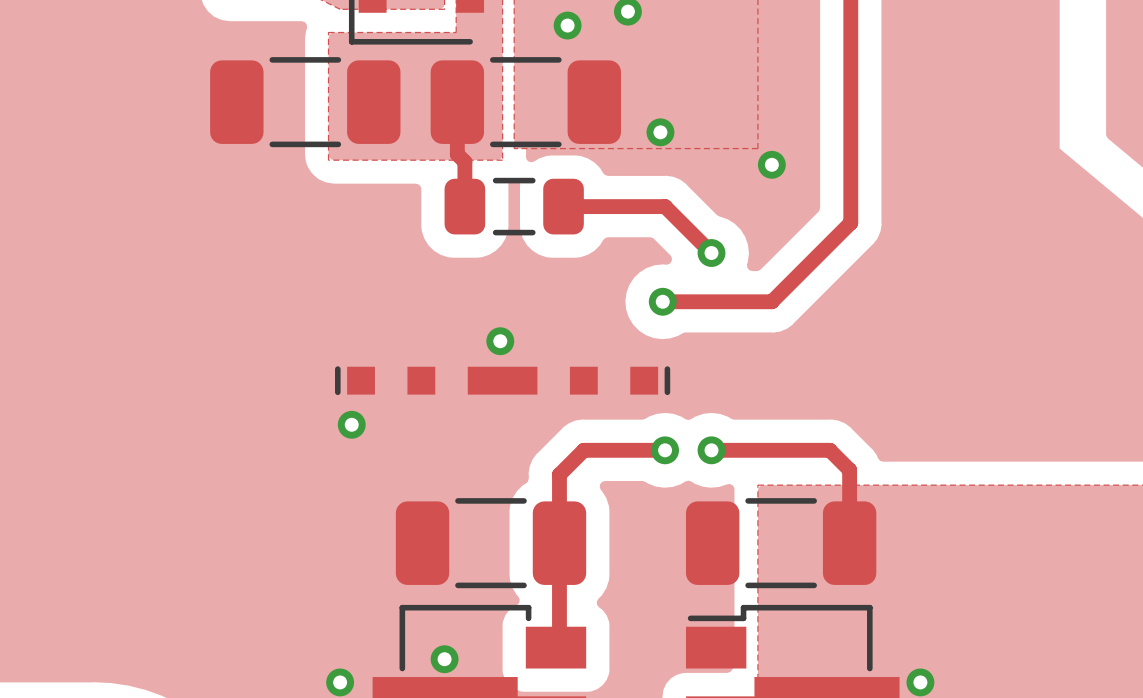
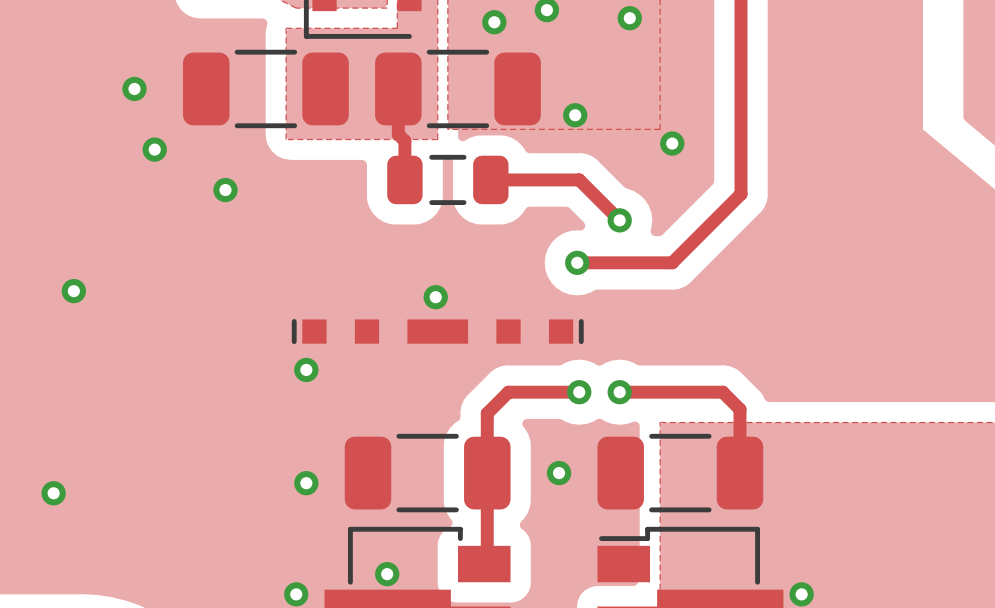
via: none -> (629, 18)
via: none -> (134, 88)
via: none -> (154, 149)
via: none -> (225, 190)
via: none -> (73, 291)
via: none -> (559, 473)
via: none -> (306, 483)
via: none -> (53, 493)

